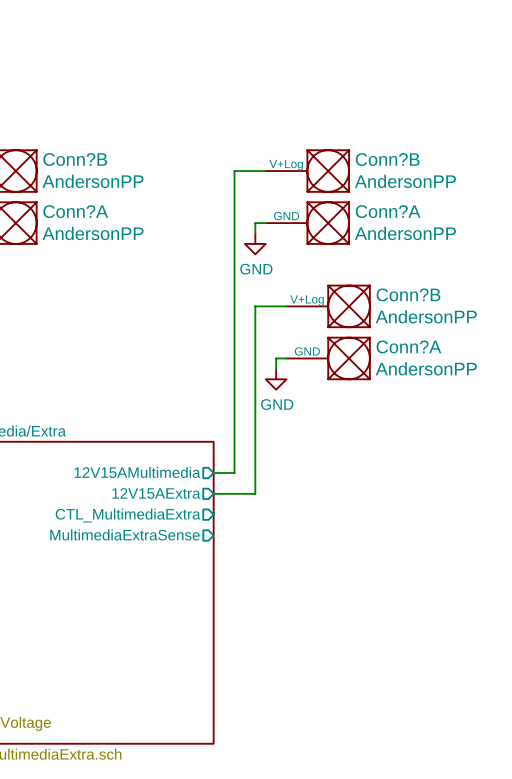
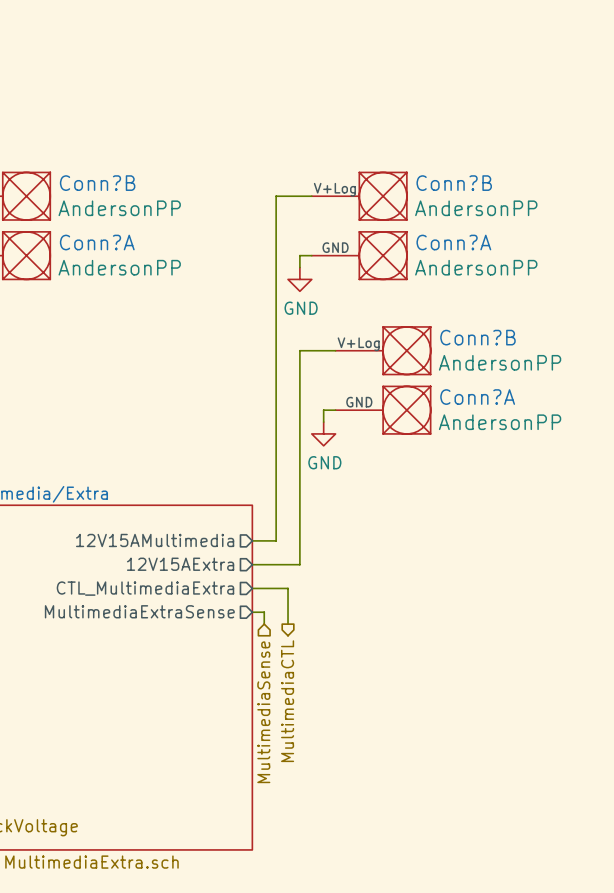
wire: none -> (252, 588) (288, 588) (288, 624)
wire: none -> (252, 612) (264, 612) (264, 624)
hierarchical label: none -> MultimediaCTL (287, 701)
hierarchical label: none -> MultimediaSense (263, 712)

